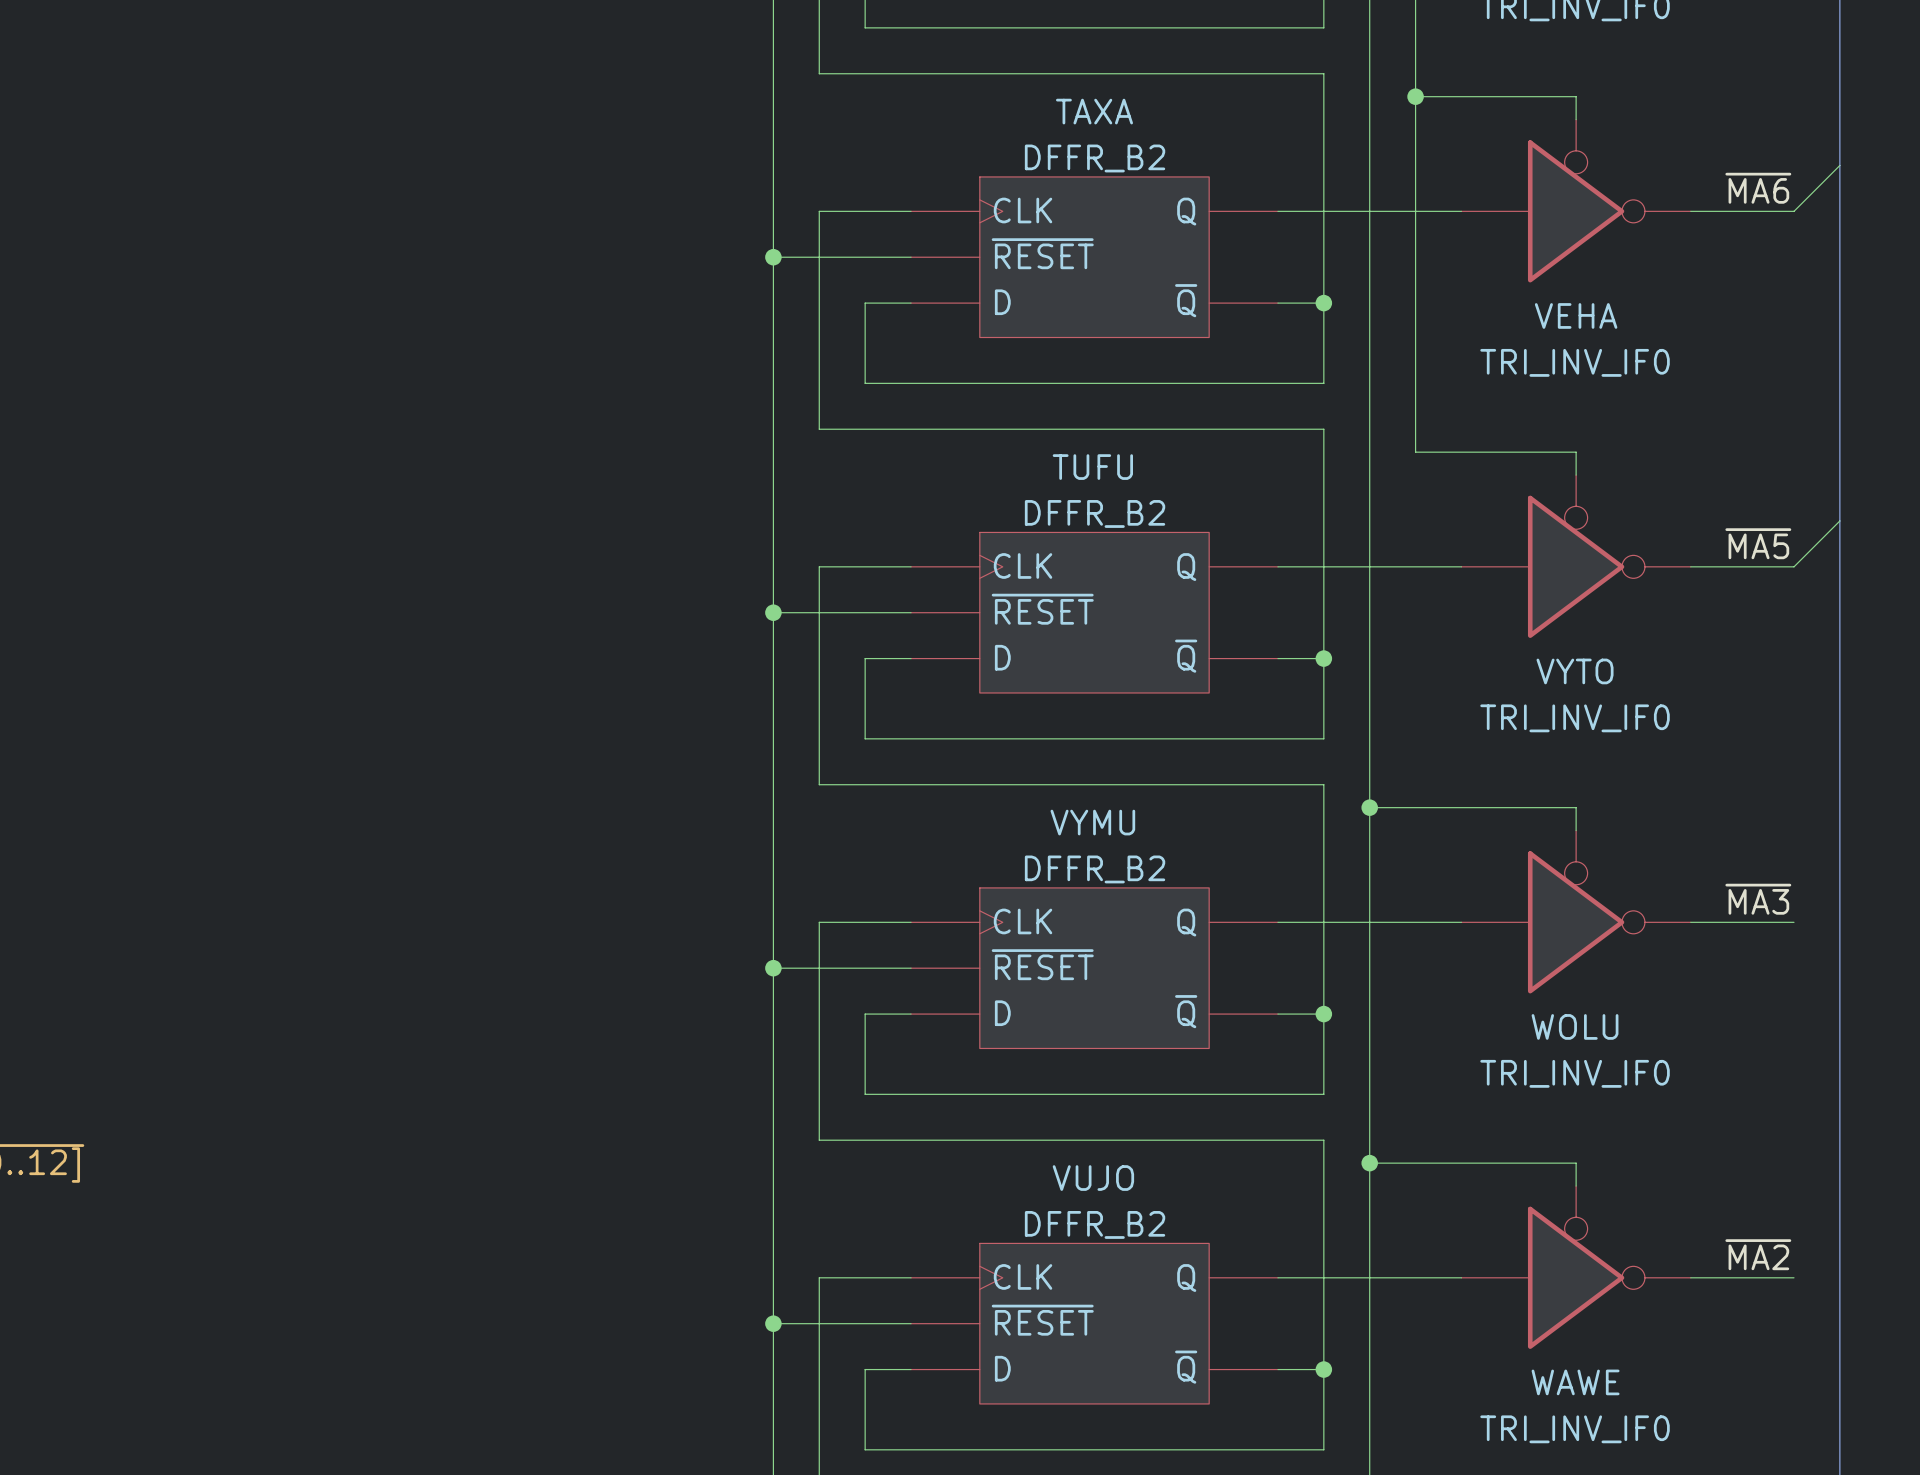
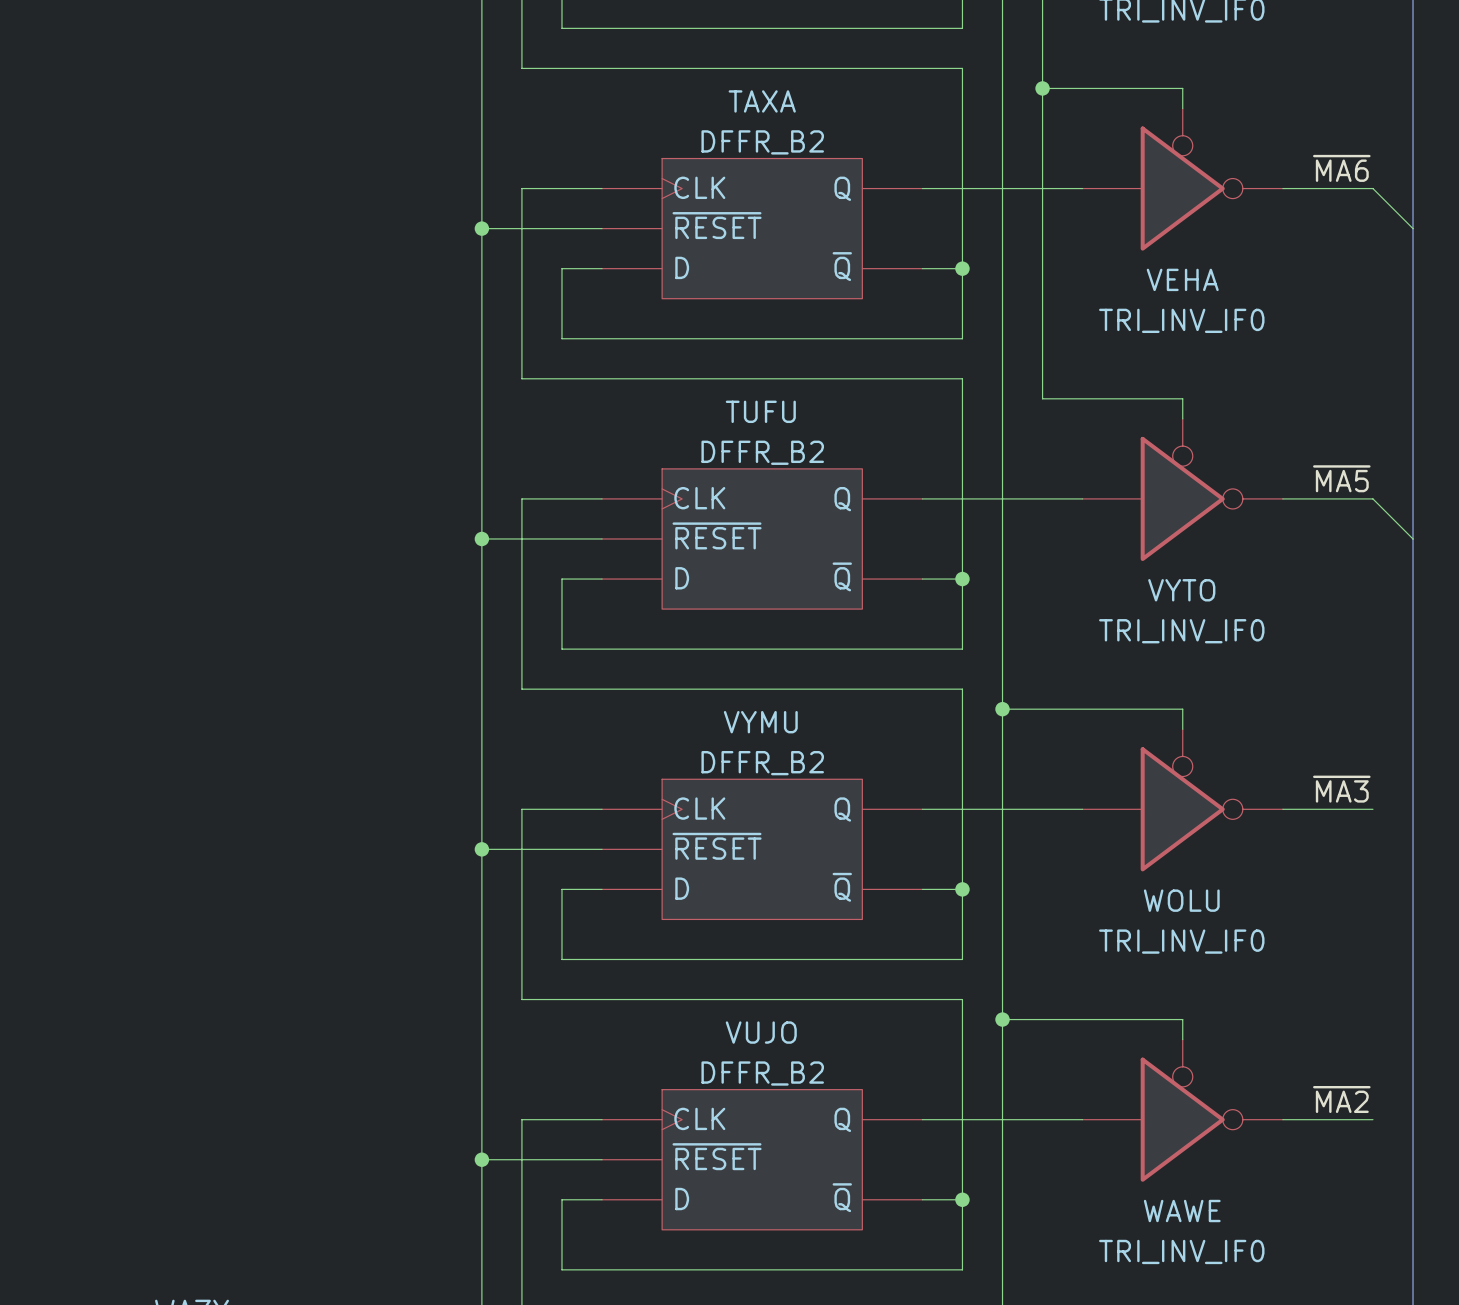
wire: (1839, 165) (1793, 211) -> (1413, 228) (1372, 188)
wire: (1839, 520) (1793, 566) -> (1413, 538) (1372, 498)

